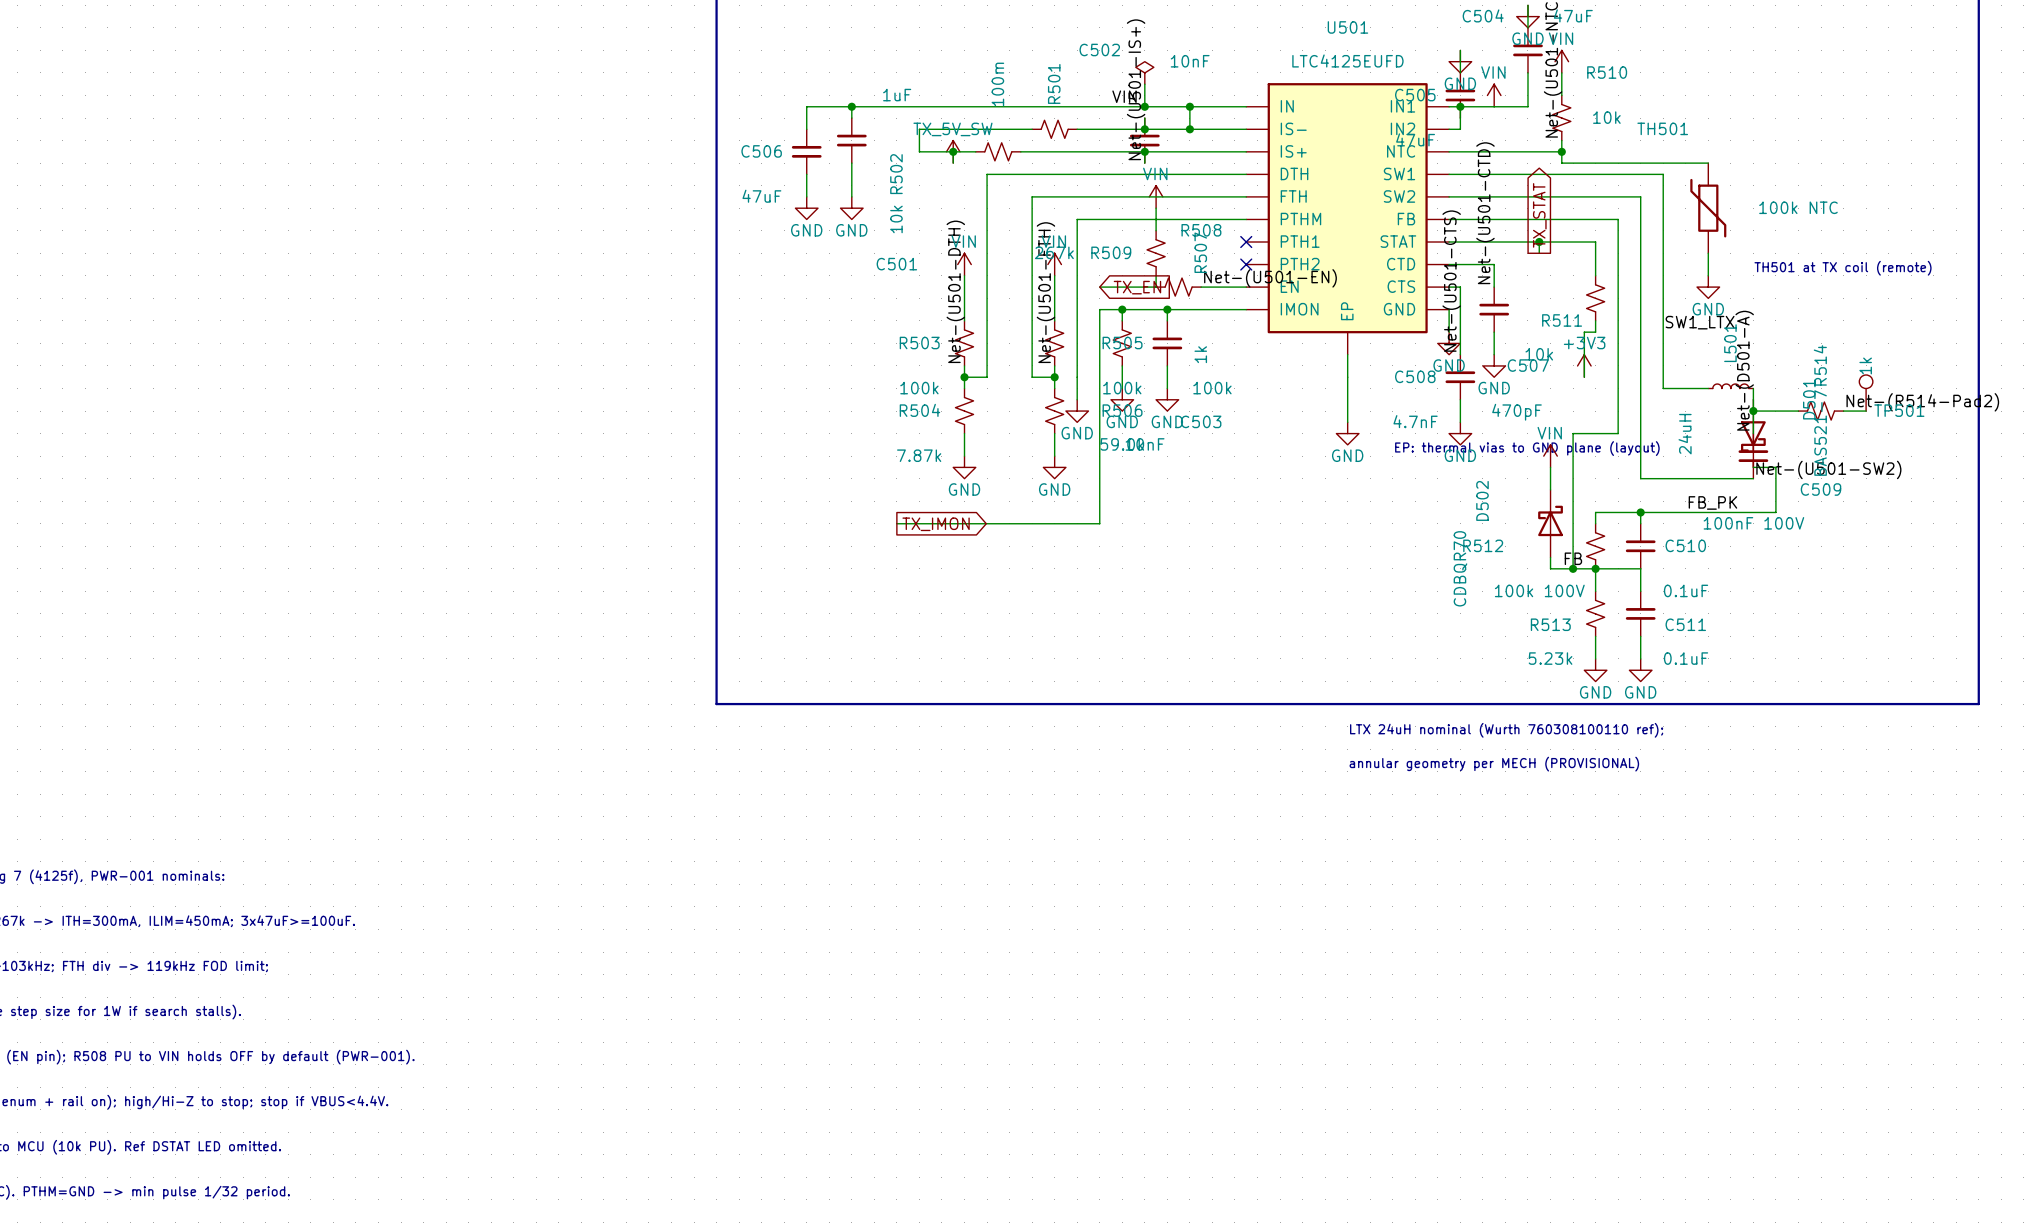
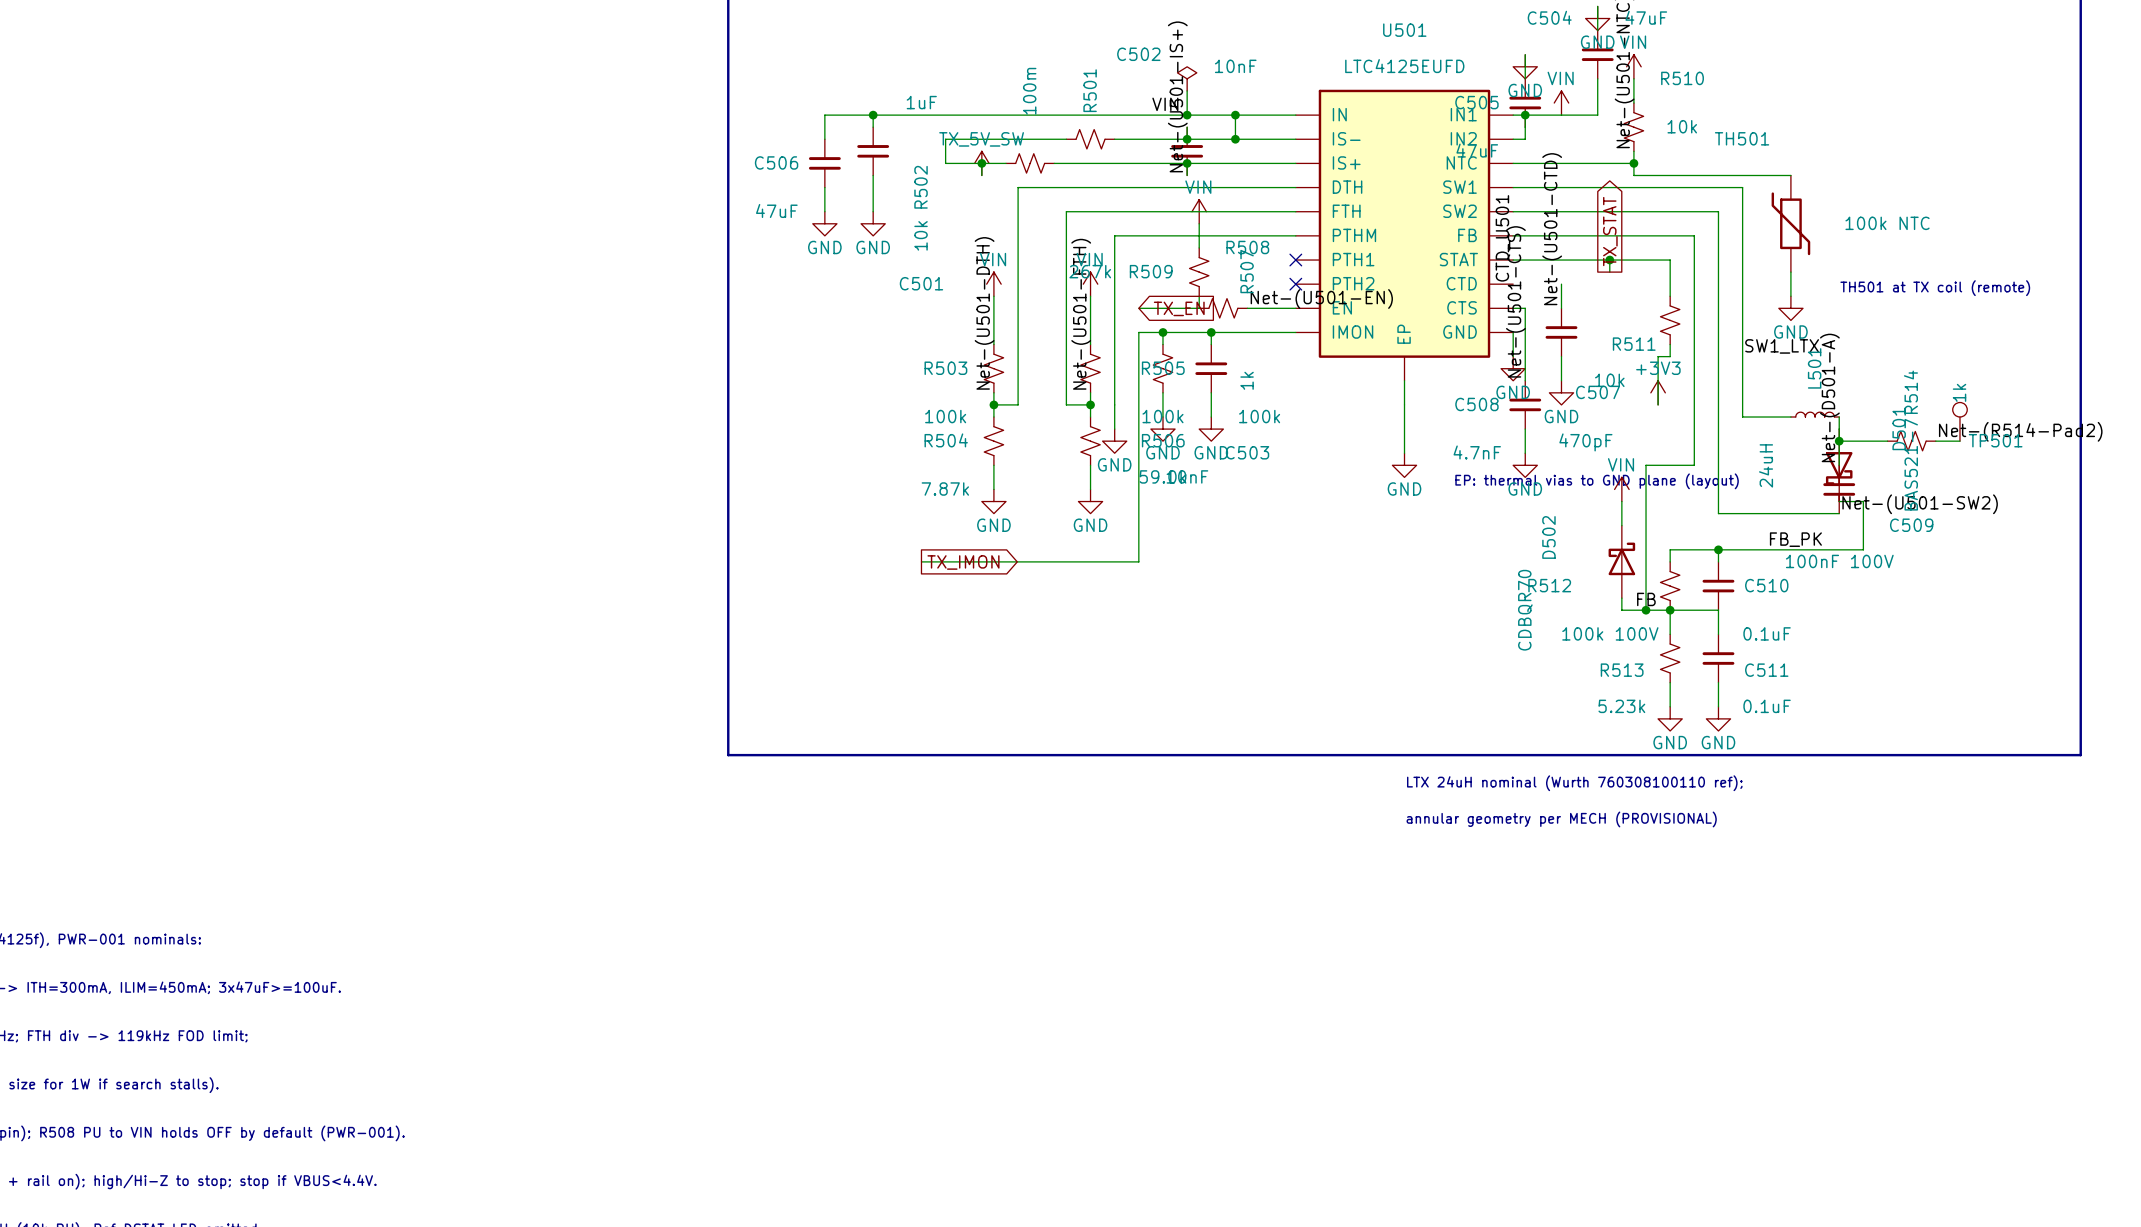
label: none -> CTD_U501 (1502, 238)
wire: (1449, 264) (1494, 264) -> none

